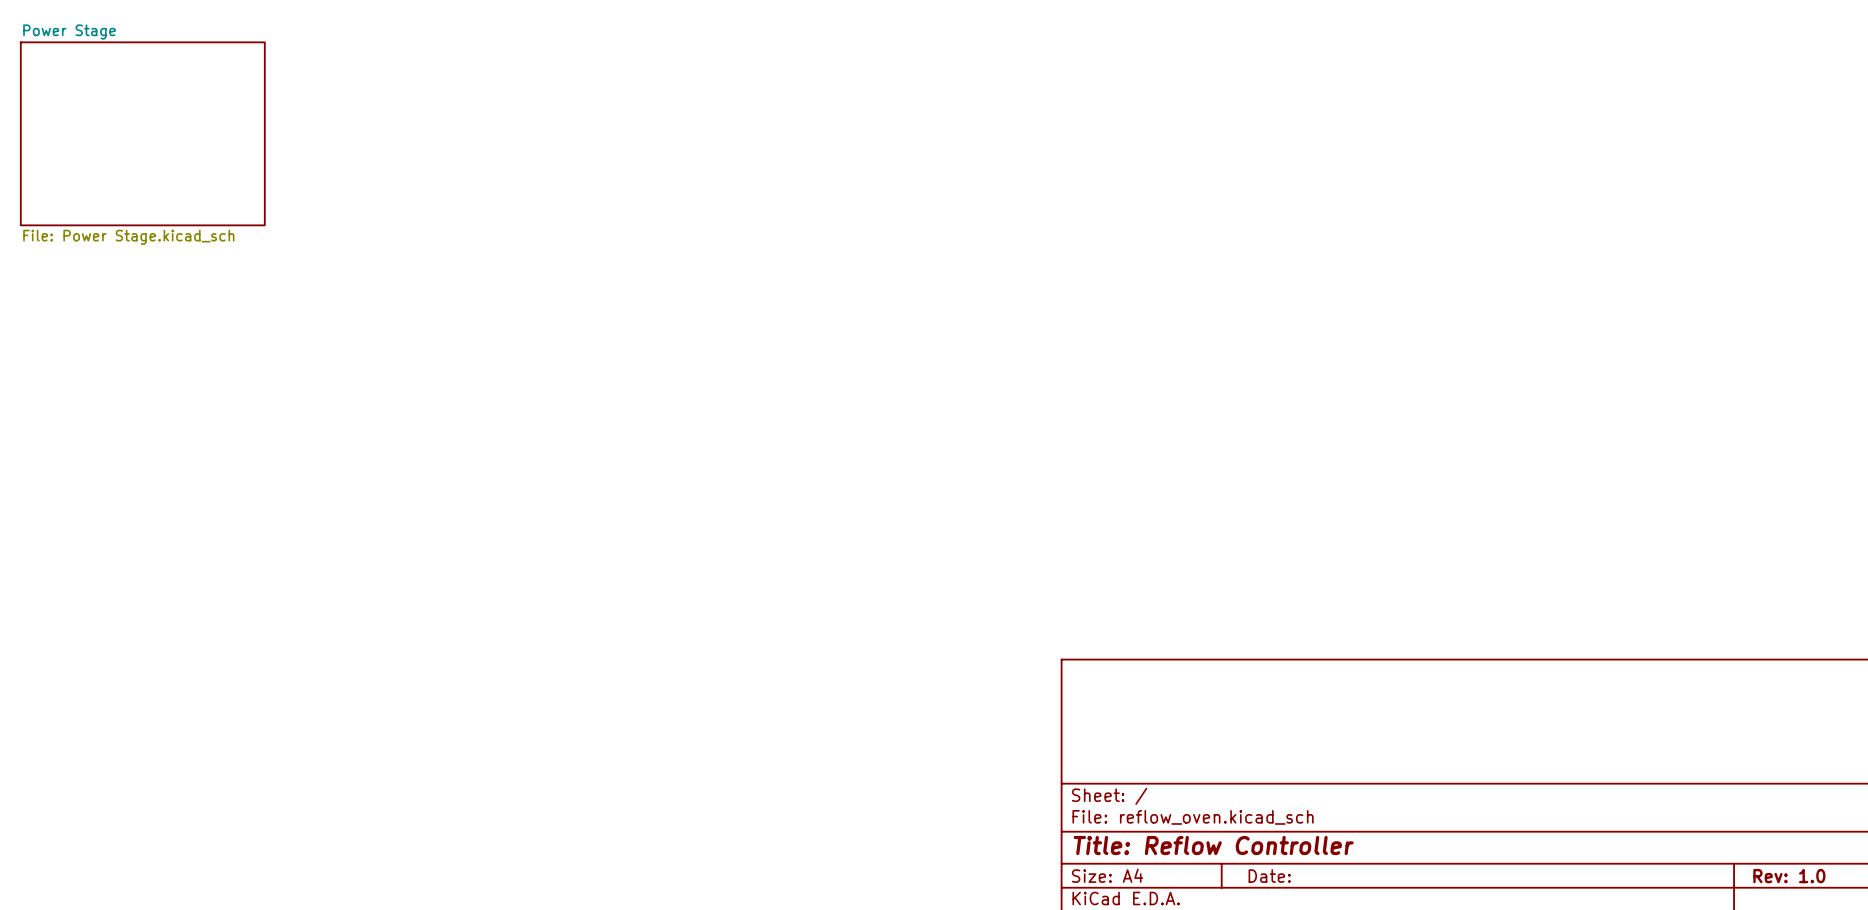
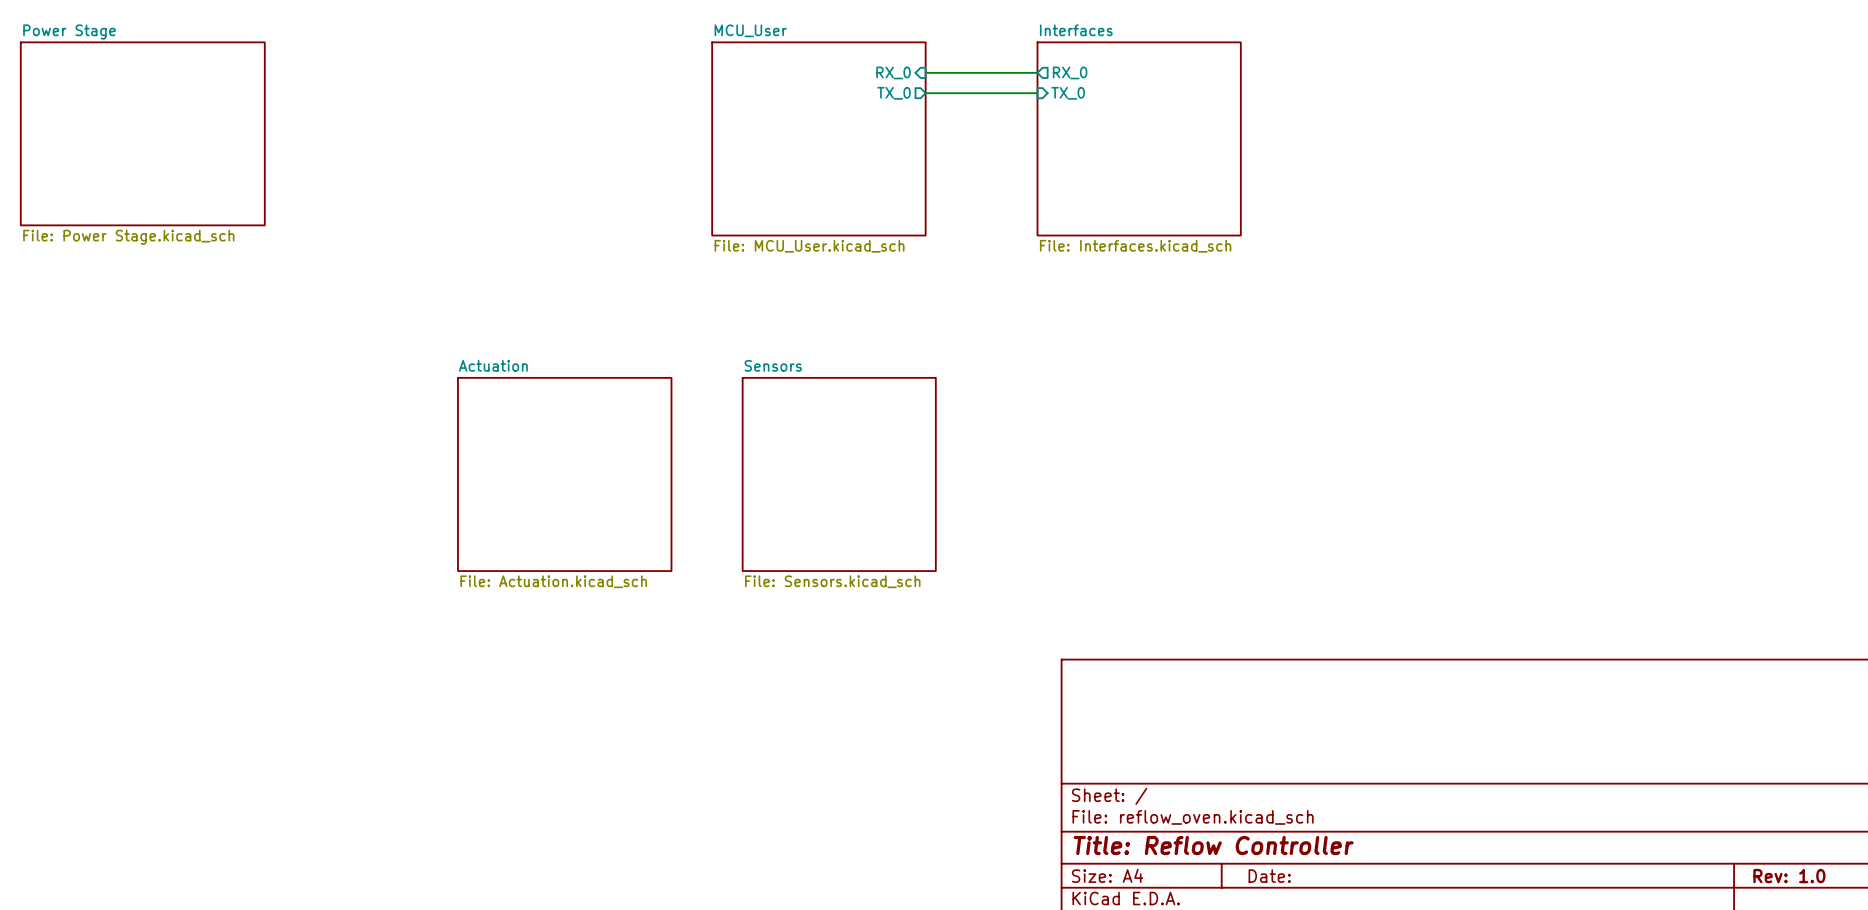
sheet pin: none -> RX_0 (893, 72)
wire: none -> (925, 72) (1037, 72)
sheet pin: none -> RX_0 (1070, 72)
sheet pin: none -> TX_0 (894, 93)
wire: none -> (925, 93) (1037, 93)
sheet pin: none -> TX_0 (1068, 93)
sheet MCU_User: none -> File: MCU_User.kicad_sch (818, 138)
sheet Interfaces: none -> File: Interfaces.kicad_sch (1139, 138)
sheet Actuation: none -> File: Actuation.kicad_sch (564, 474)
sheet Sensors: none -> File: Sensors.kicad_sch (839, 474)

